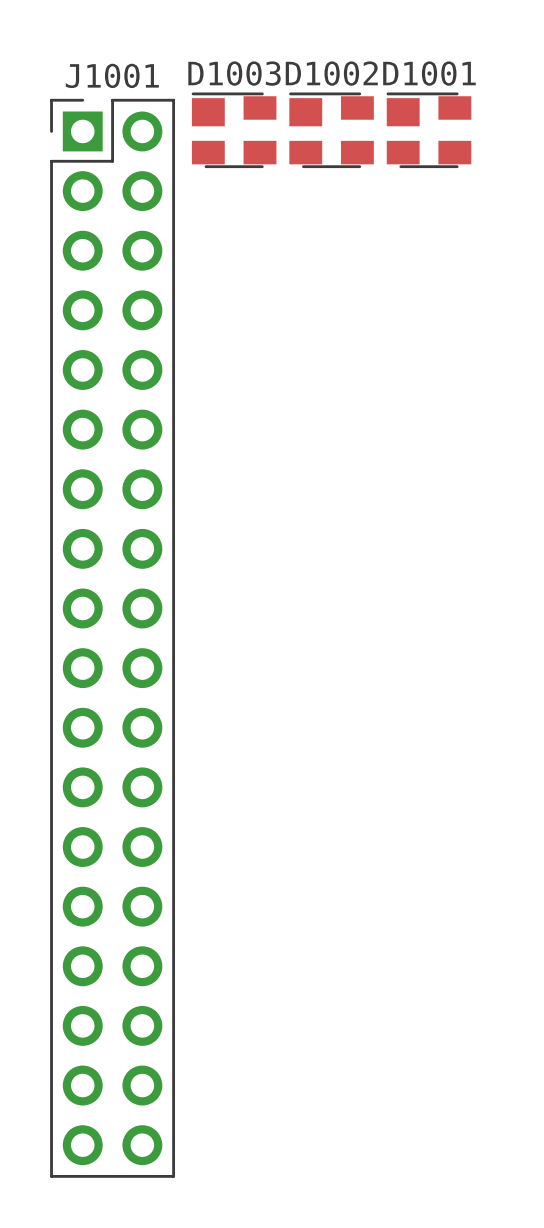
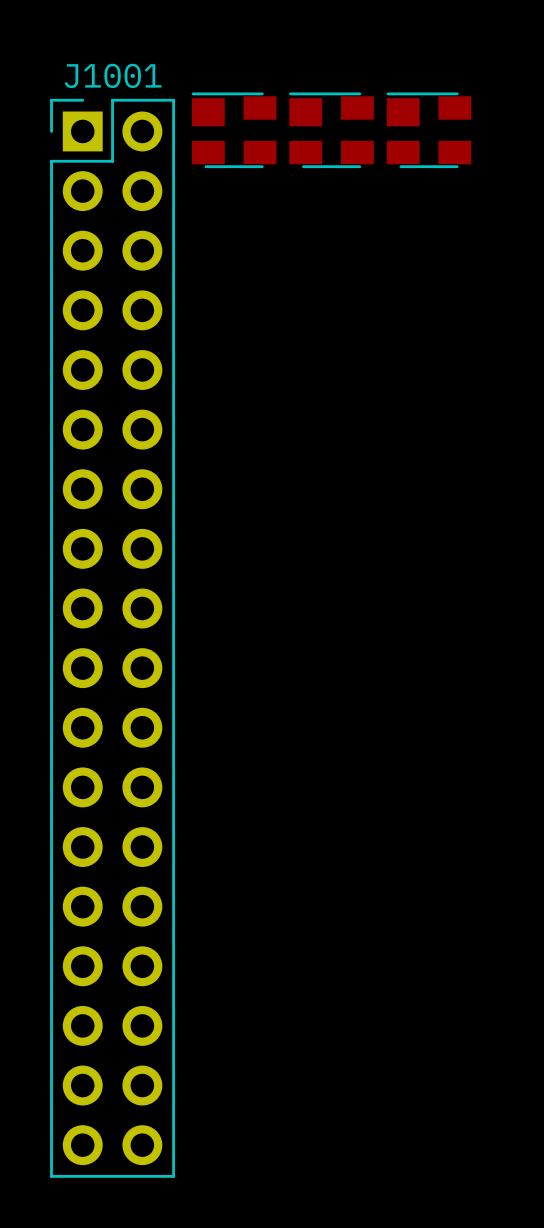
D1003 name: D1003 (234, 73) -> none
D1002 name: D1002 (331, 73) -> none
D1001 name: D1001 (429, 73) -> none

